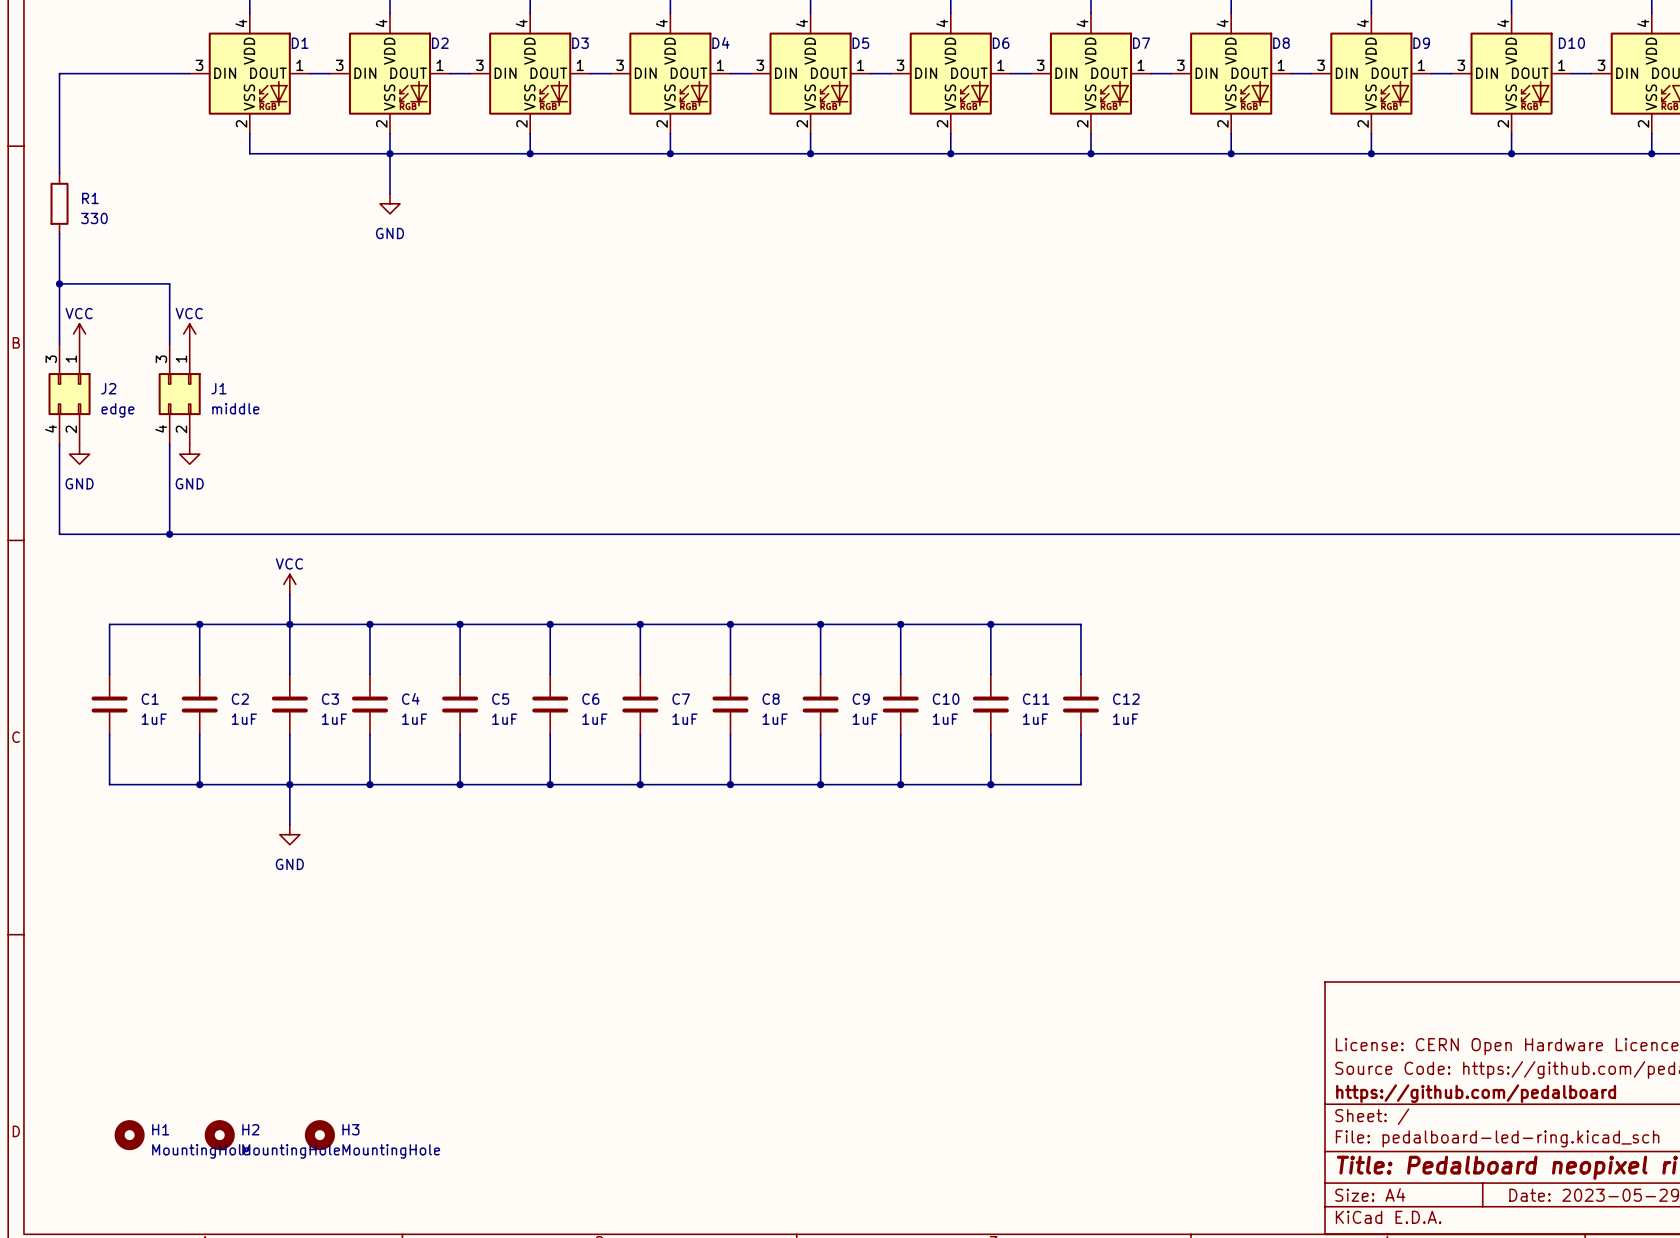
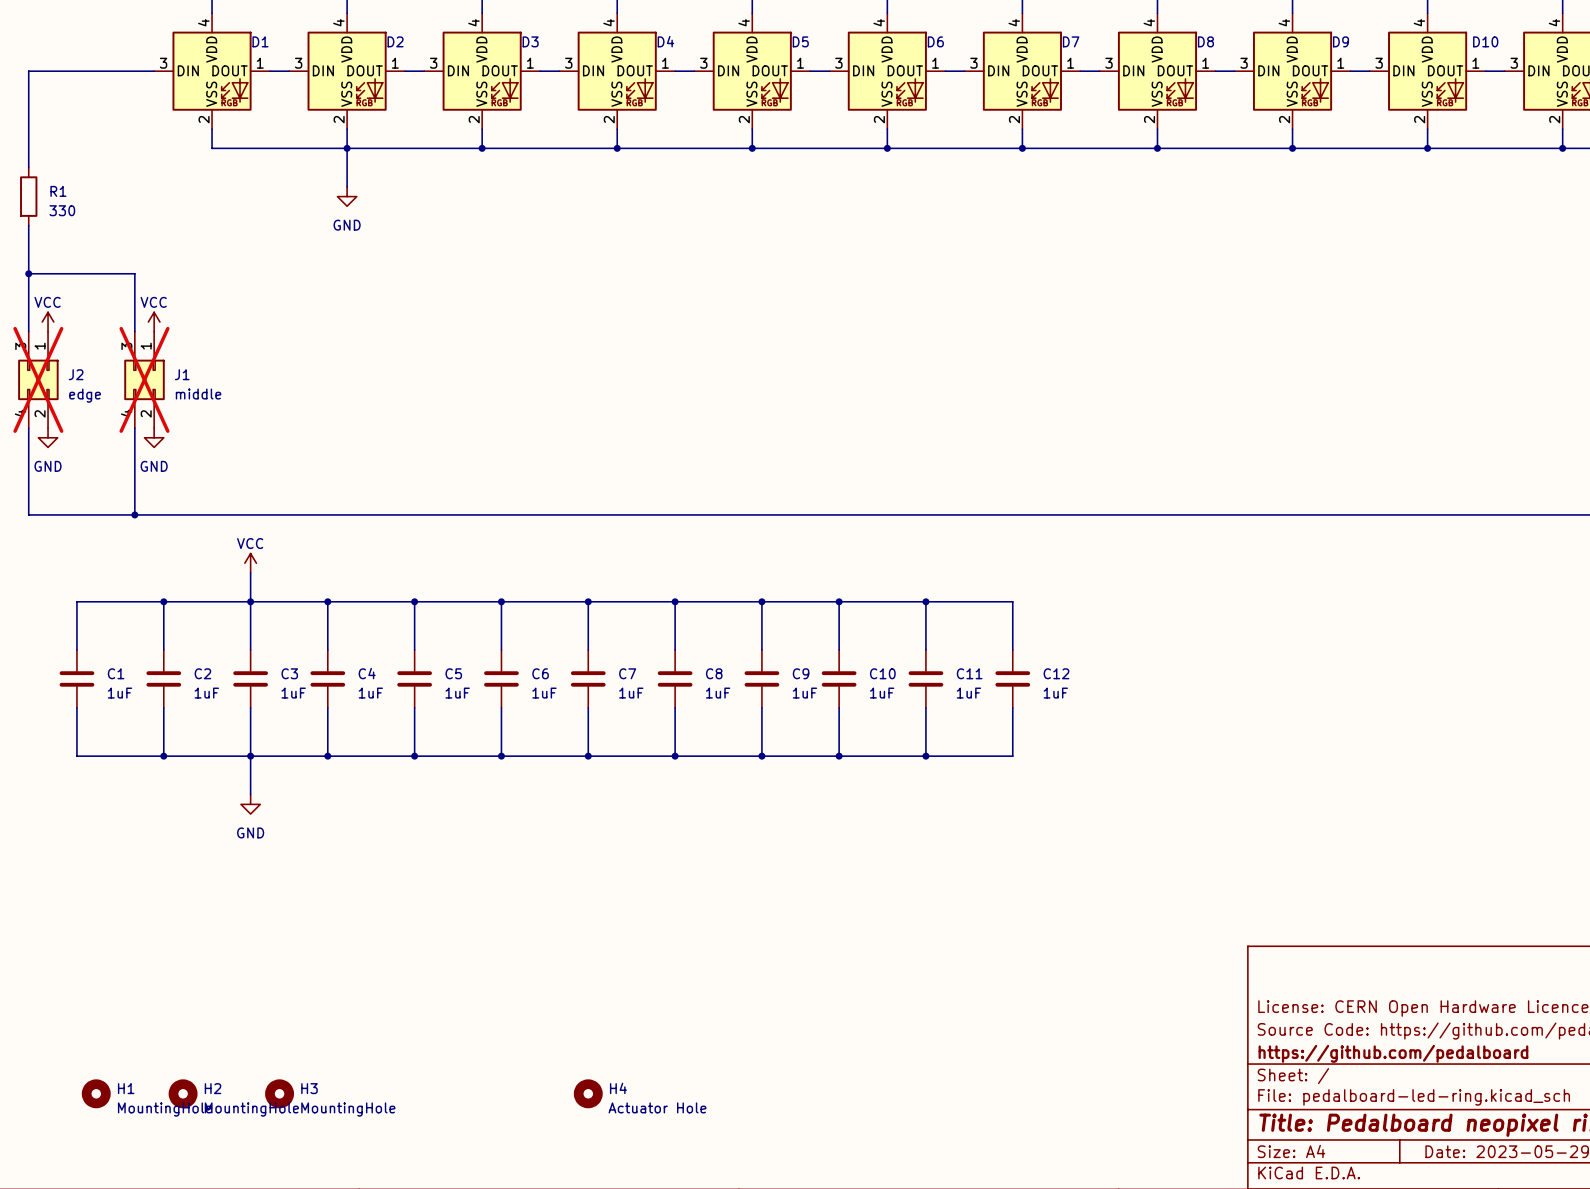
J2 do-not-place cross: none -> (38, 379)
J1 do-not-place cross: none -> (144, 379)
H4: none -> Actuator Hole (588, 1093)

